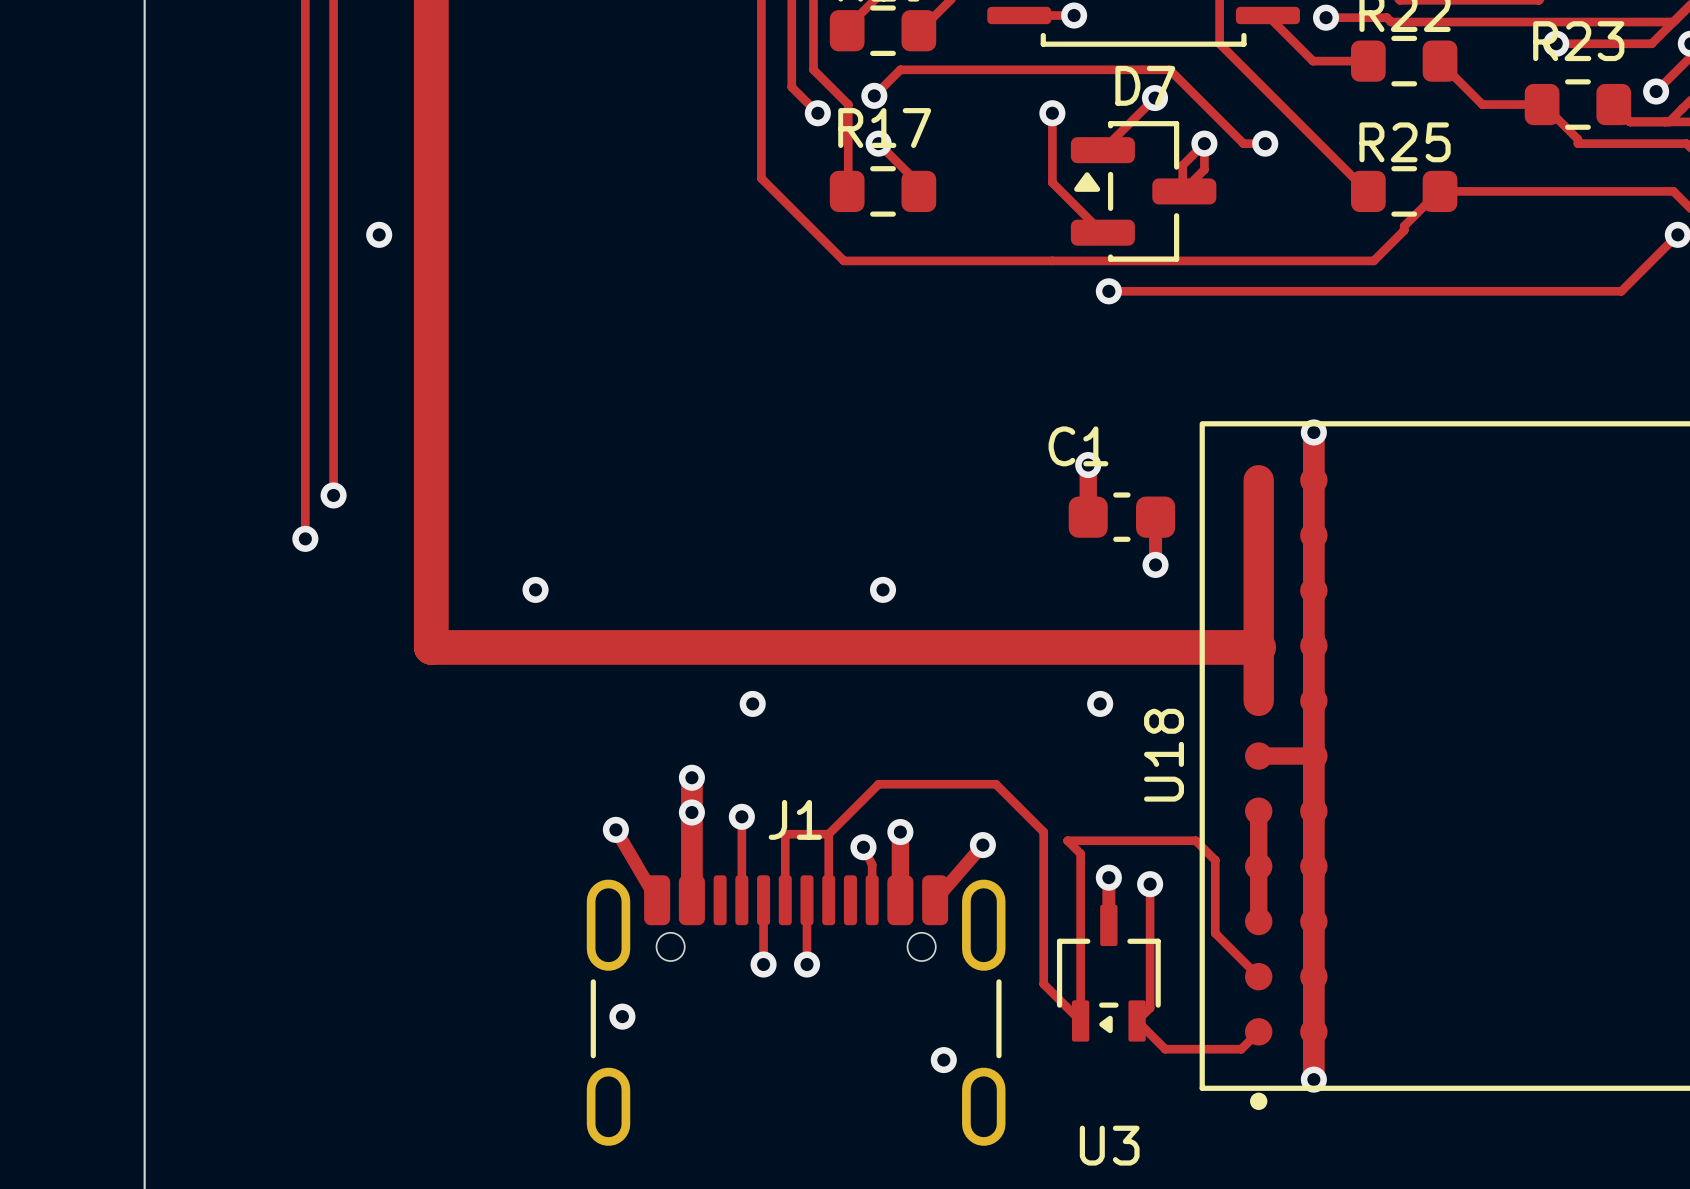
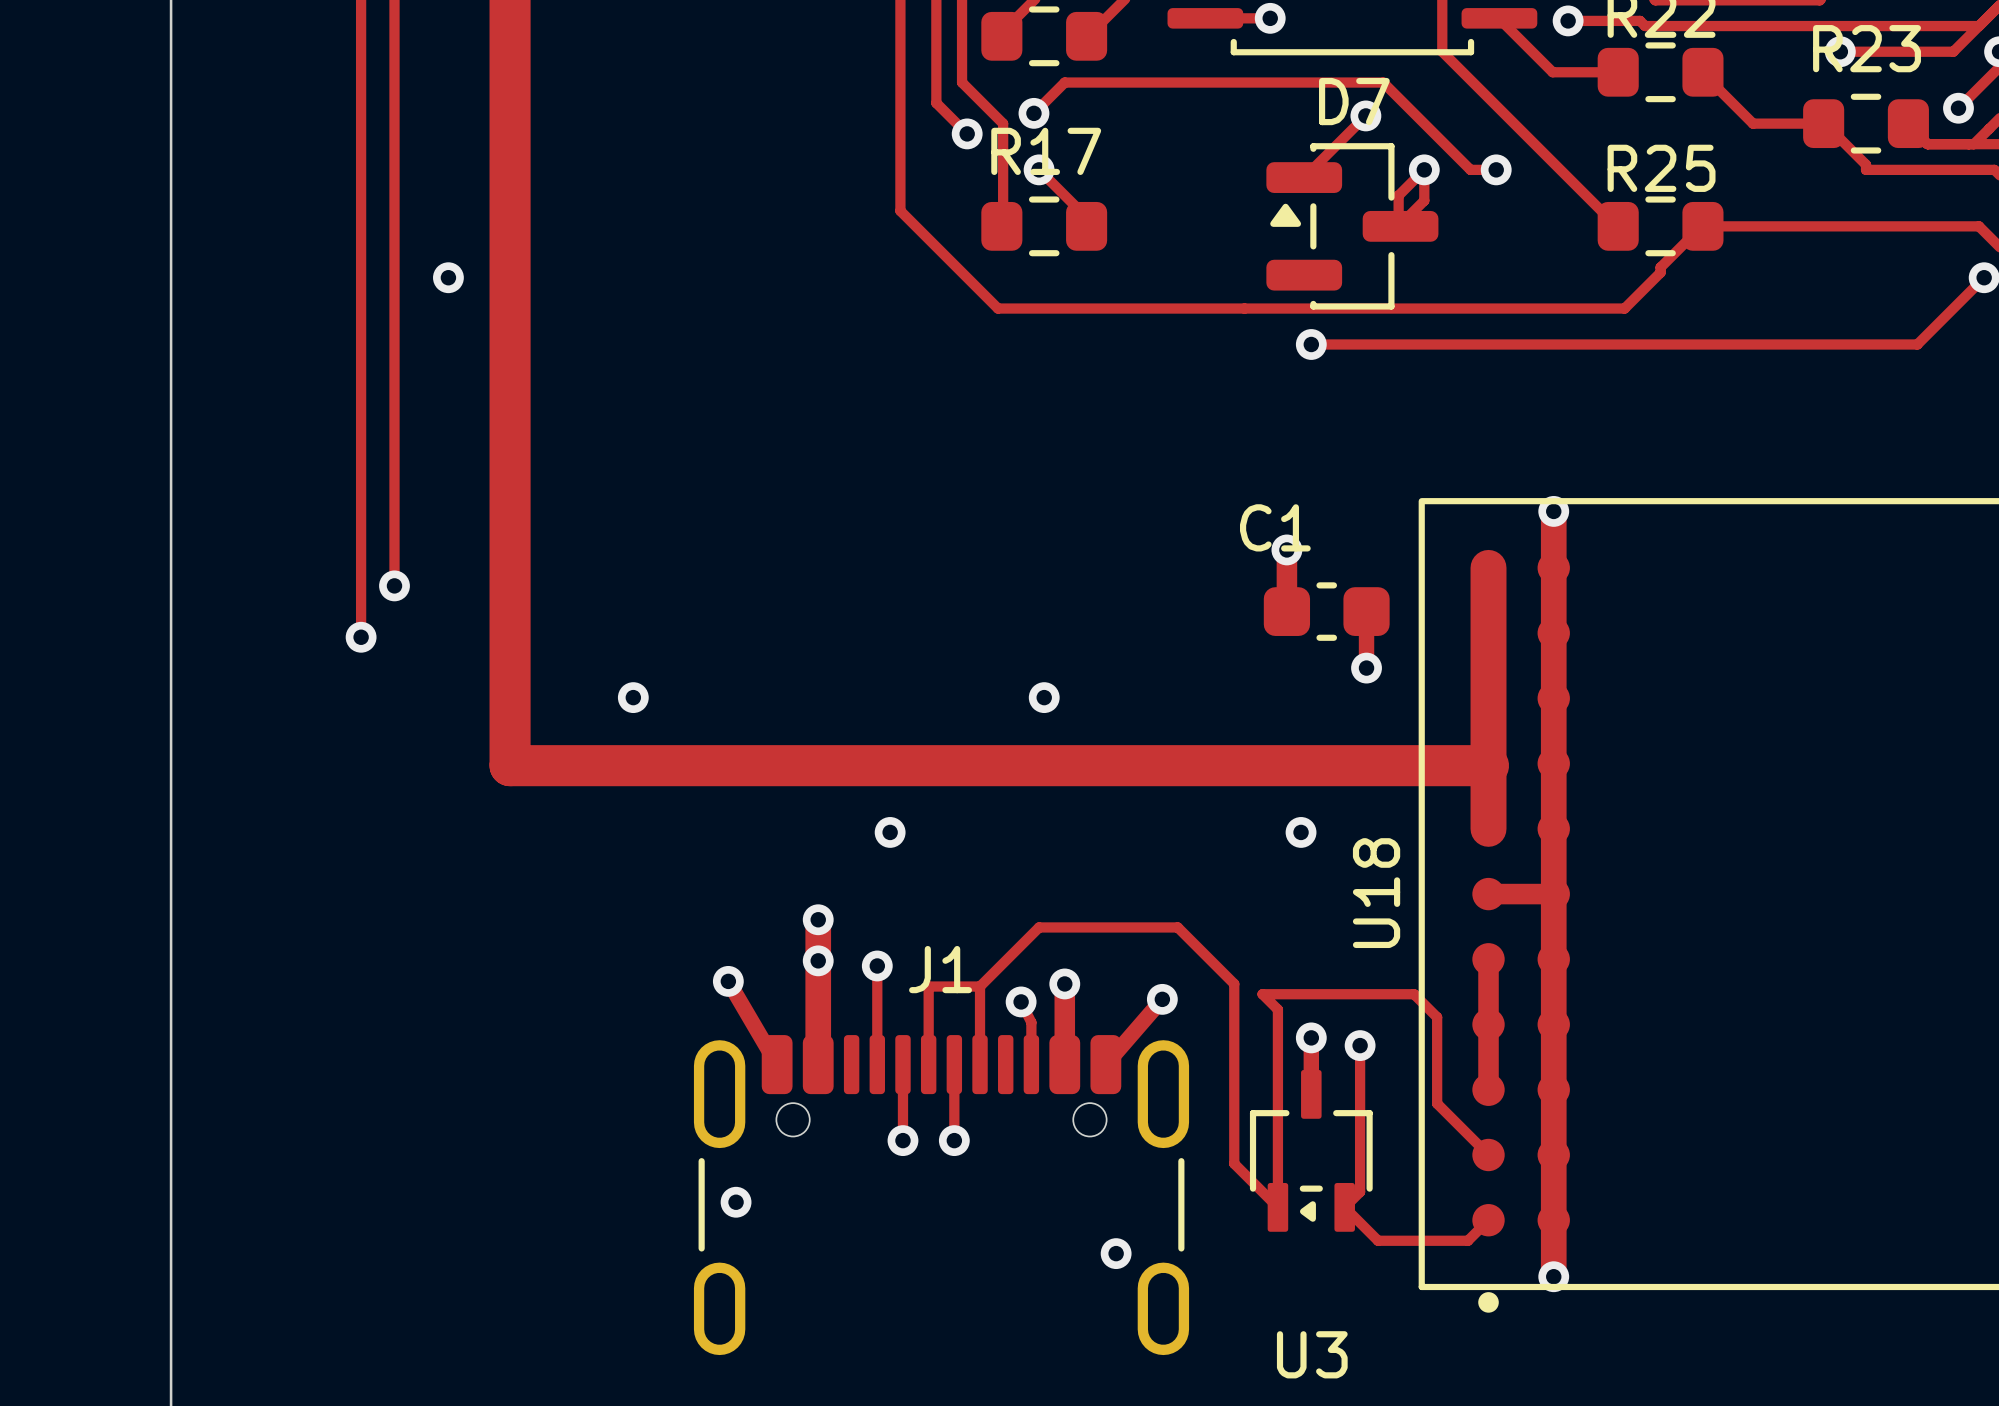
track: (1052, 113) (1052, 182) (1104, 234) (1102, 232) -> none
via: (1052, 113) -> none

